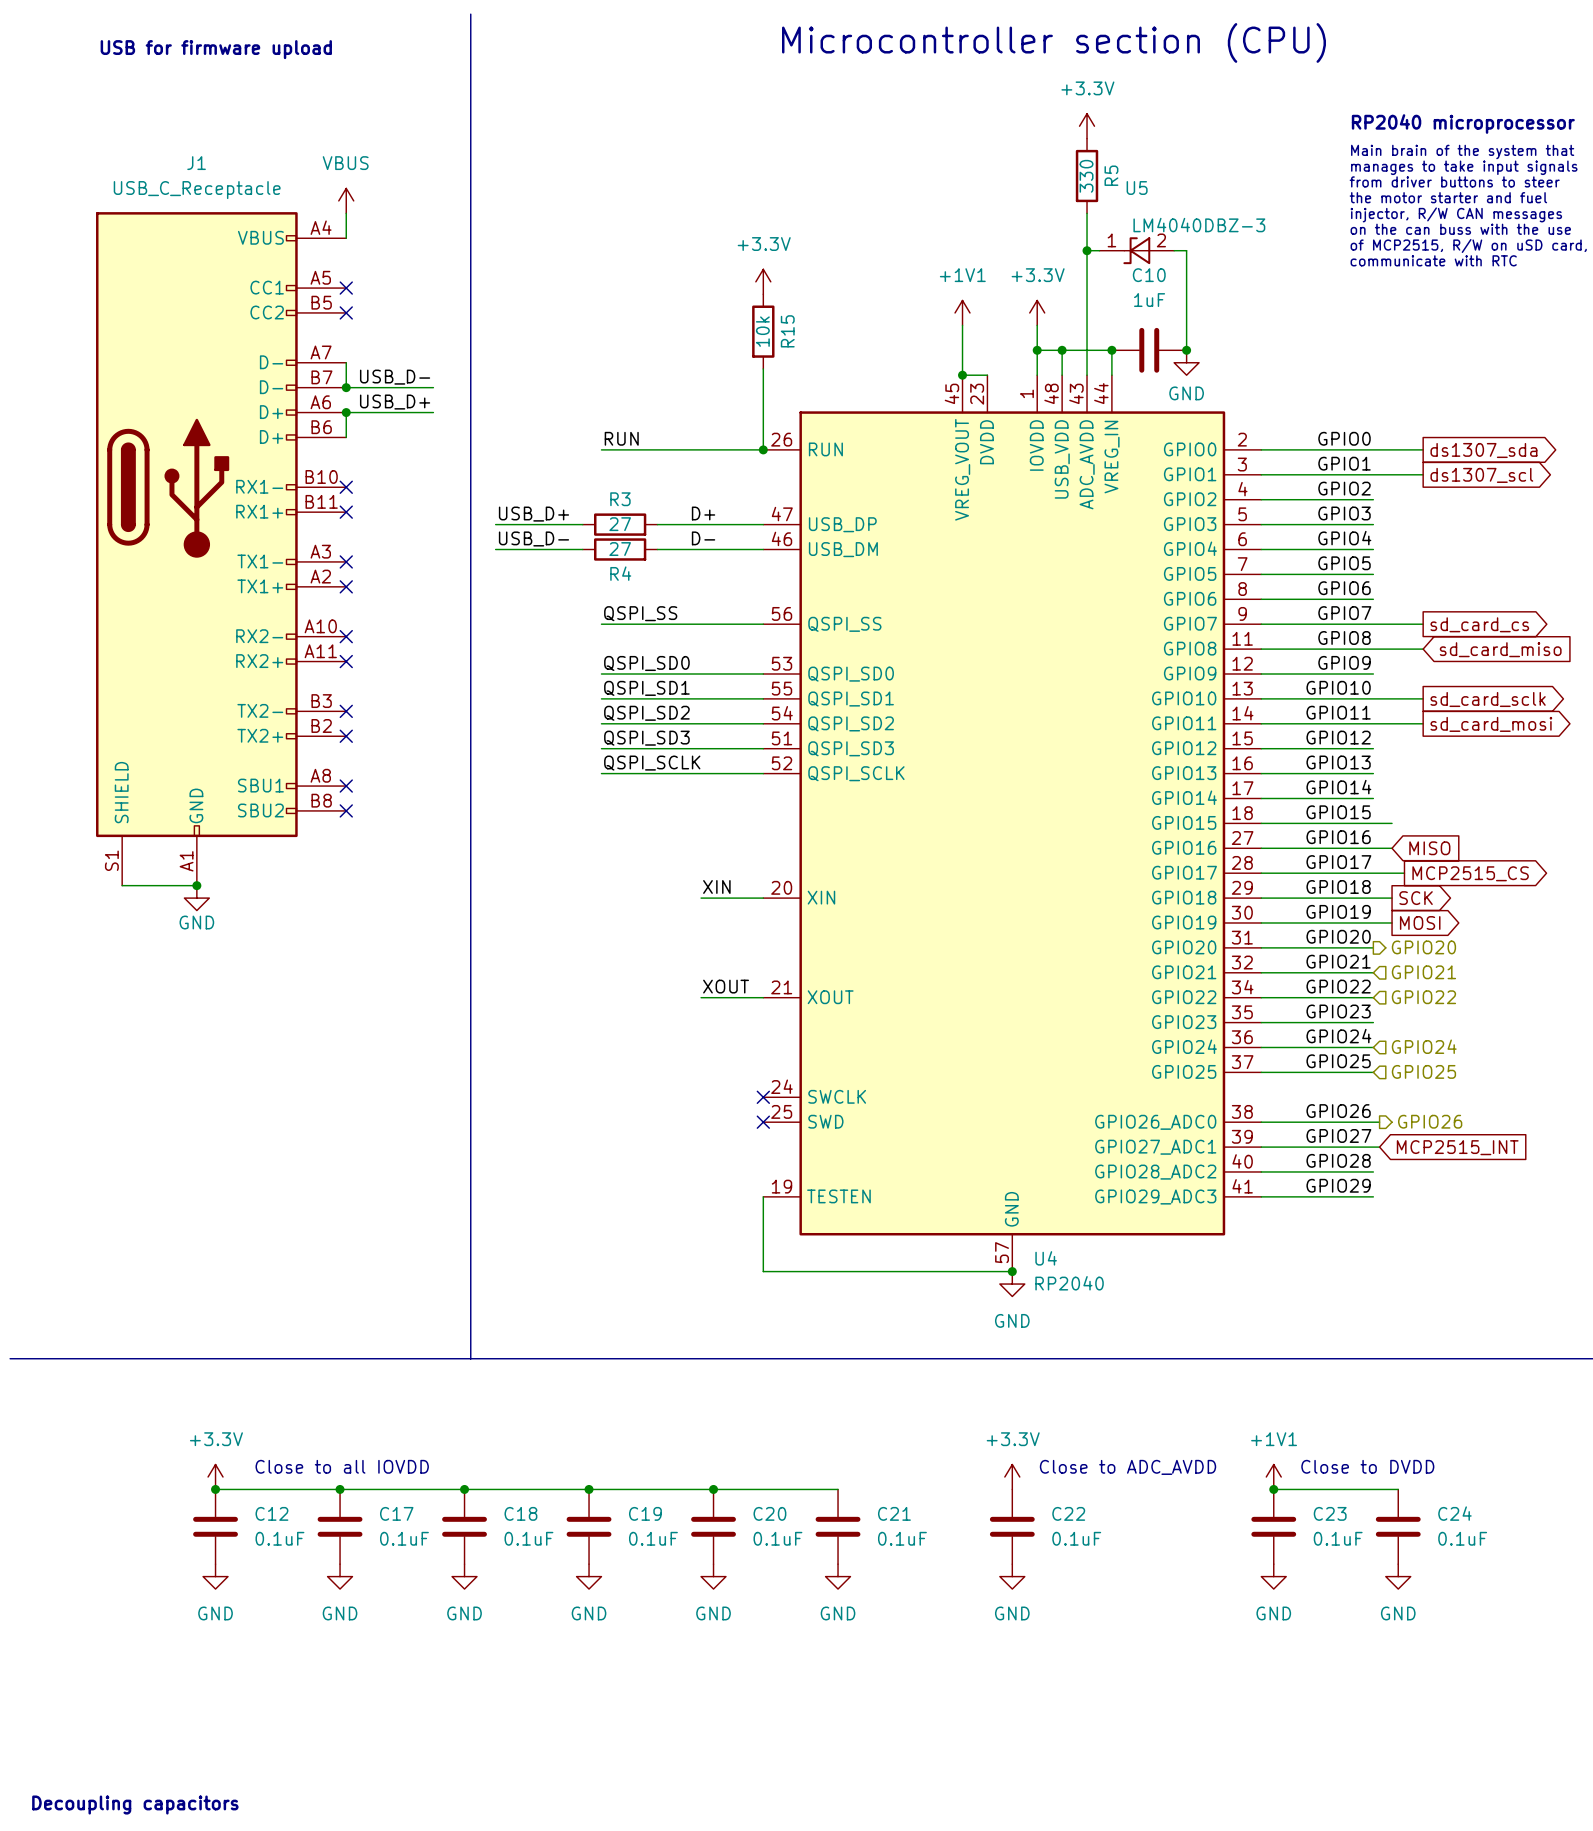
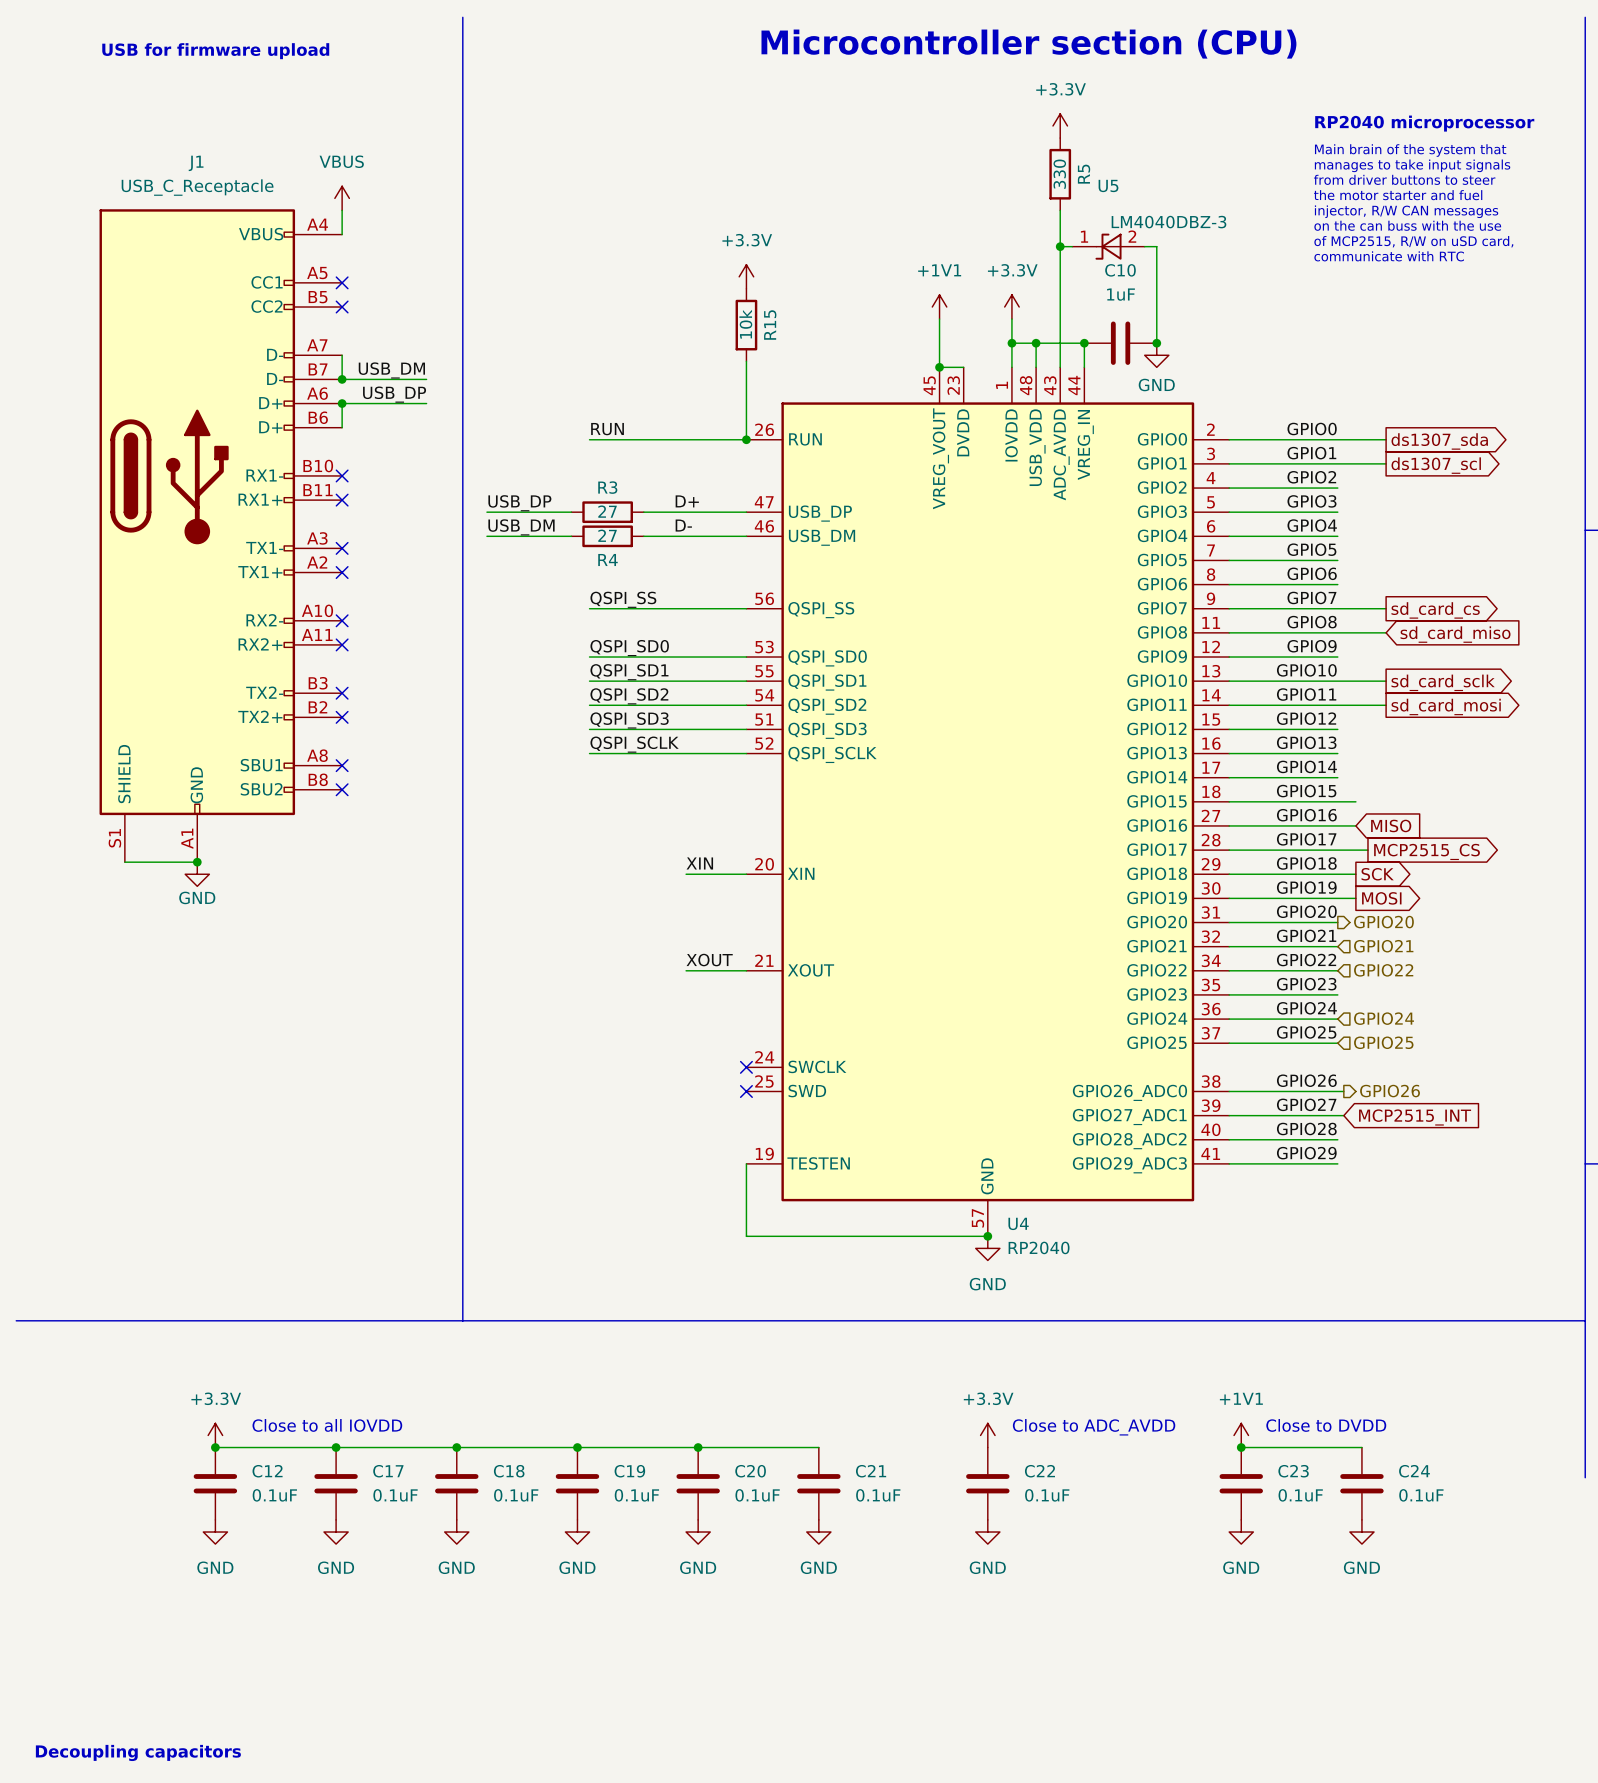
label: USB_D- (395, 377) -> USB_DM (391, 370)
label: USB_D+ (395, 402) -> USB_DP (394, 394)
label: USB_D+ (533, 514) -> USB_DP (519, 503)
label: USB_D- (533, 538) -> USB_DM (521, 527)

